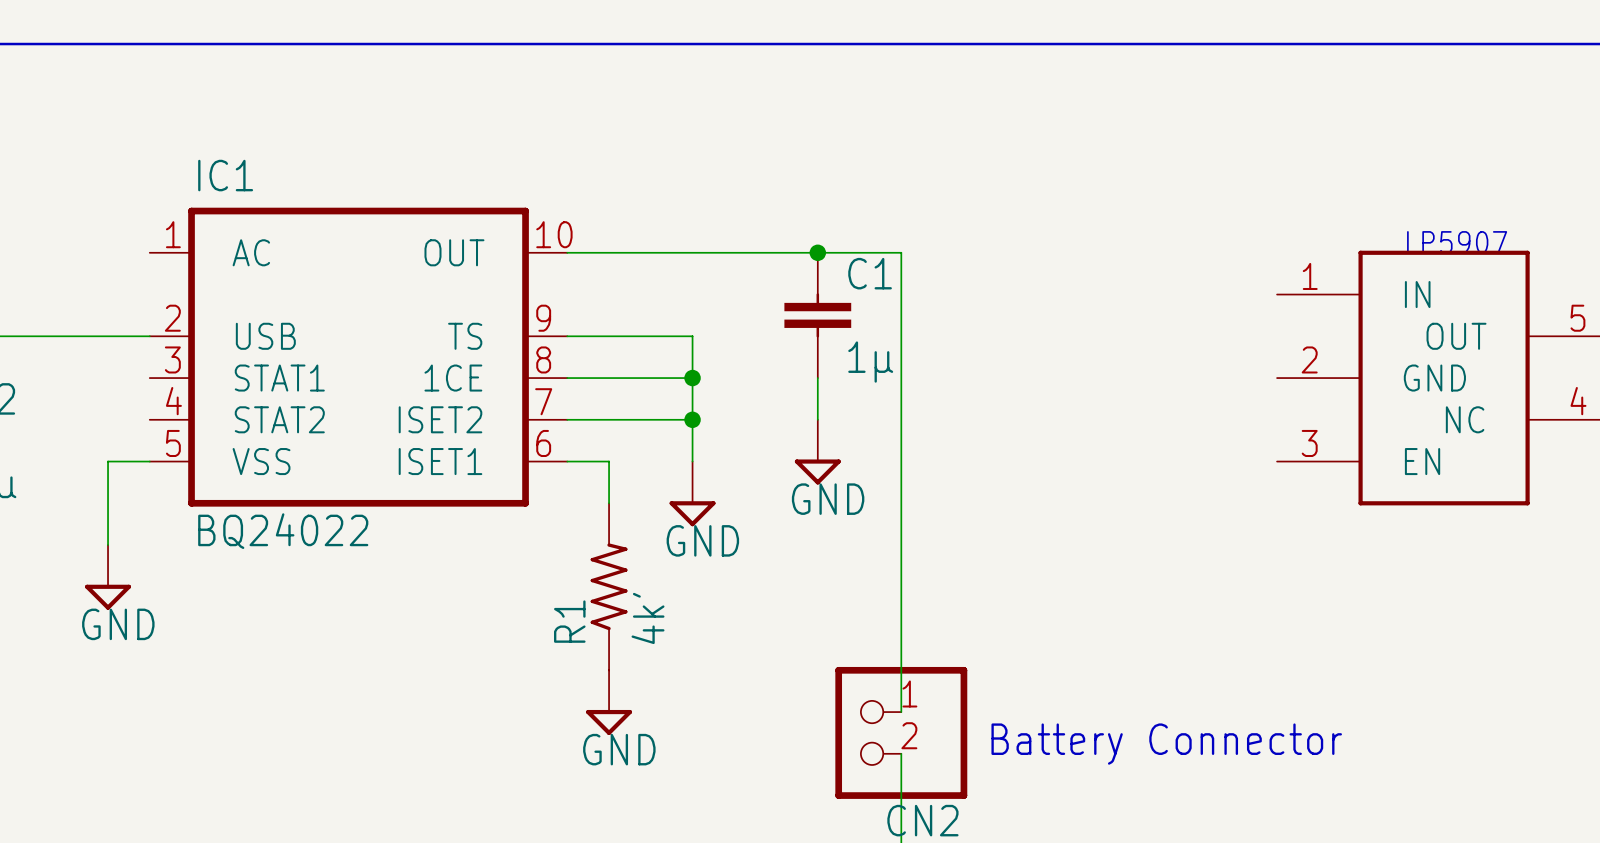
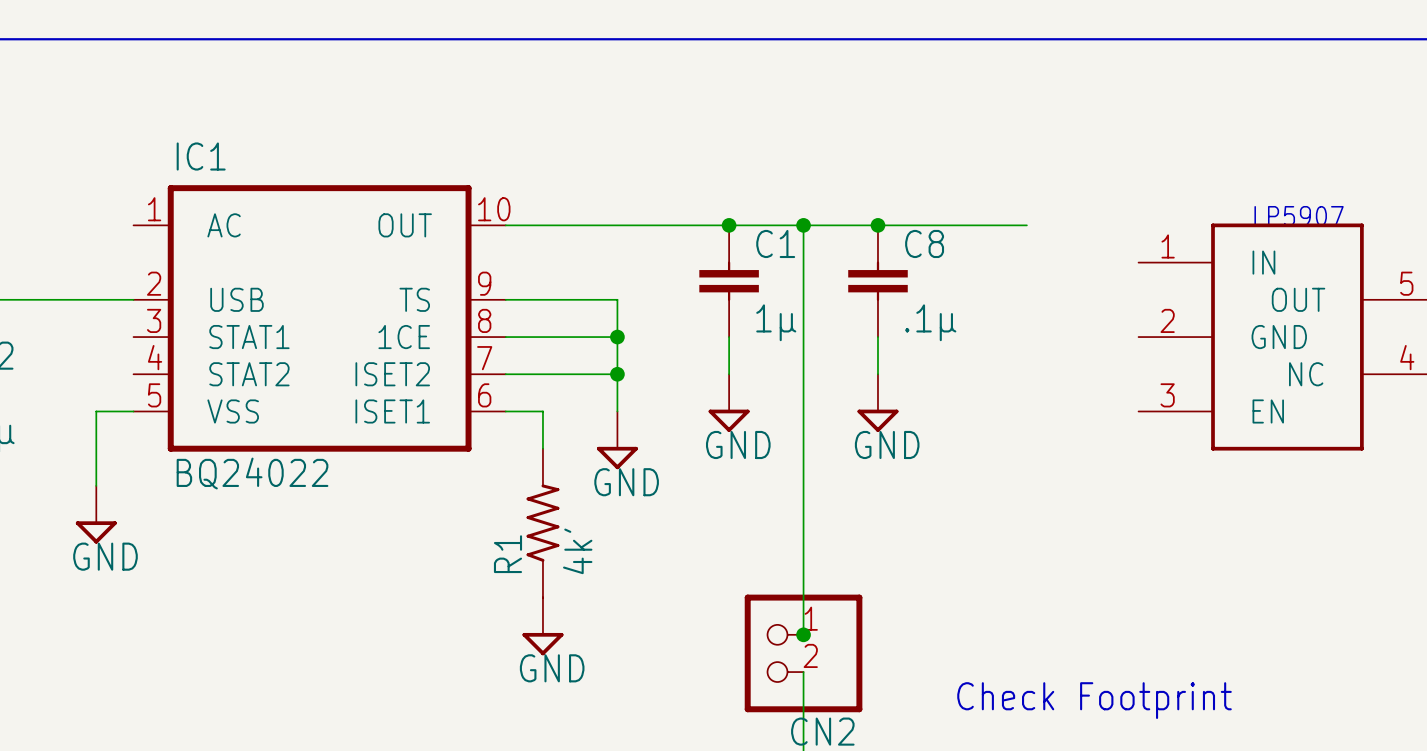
wire: none -> (803, 225) (1026, 225)
junction: none -> (803, 225)
junction: none -> (877, 225)
C8: none -> .1µ (877, 281)
wire: none -> (877, 337) (877, 374)
power symbol: none -> GND (877, 403)
junction: none -> (803, 634)
text: Battery Connector (1166, 744) -> none
text: none -> Check Footprint (1094, 700)

